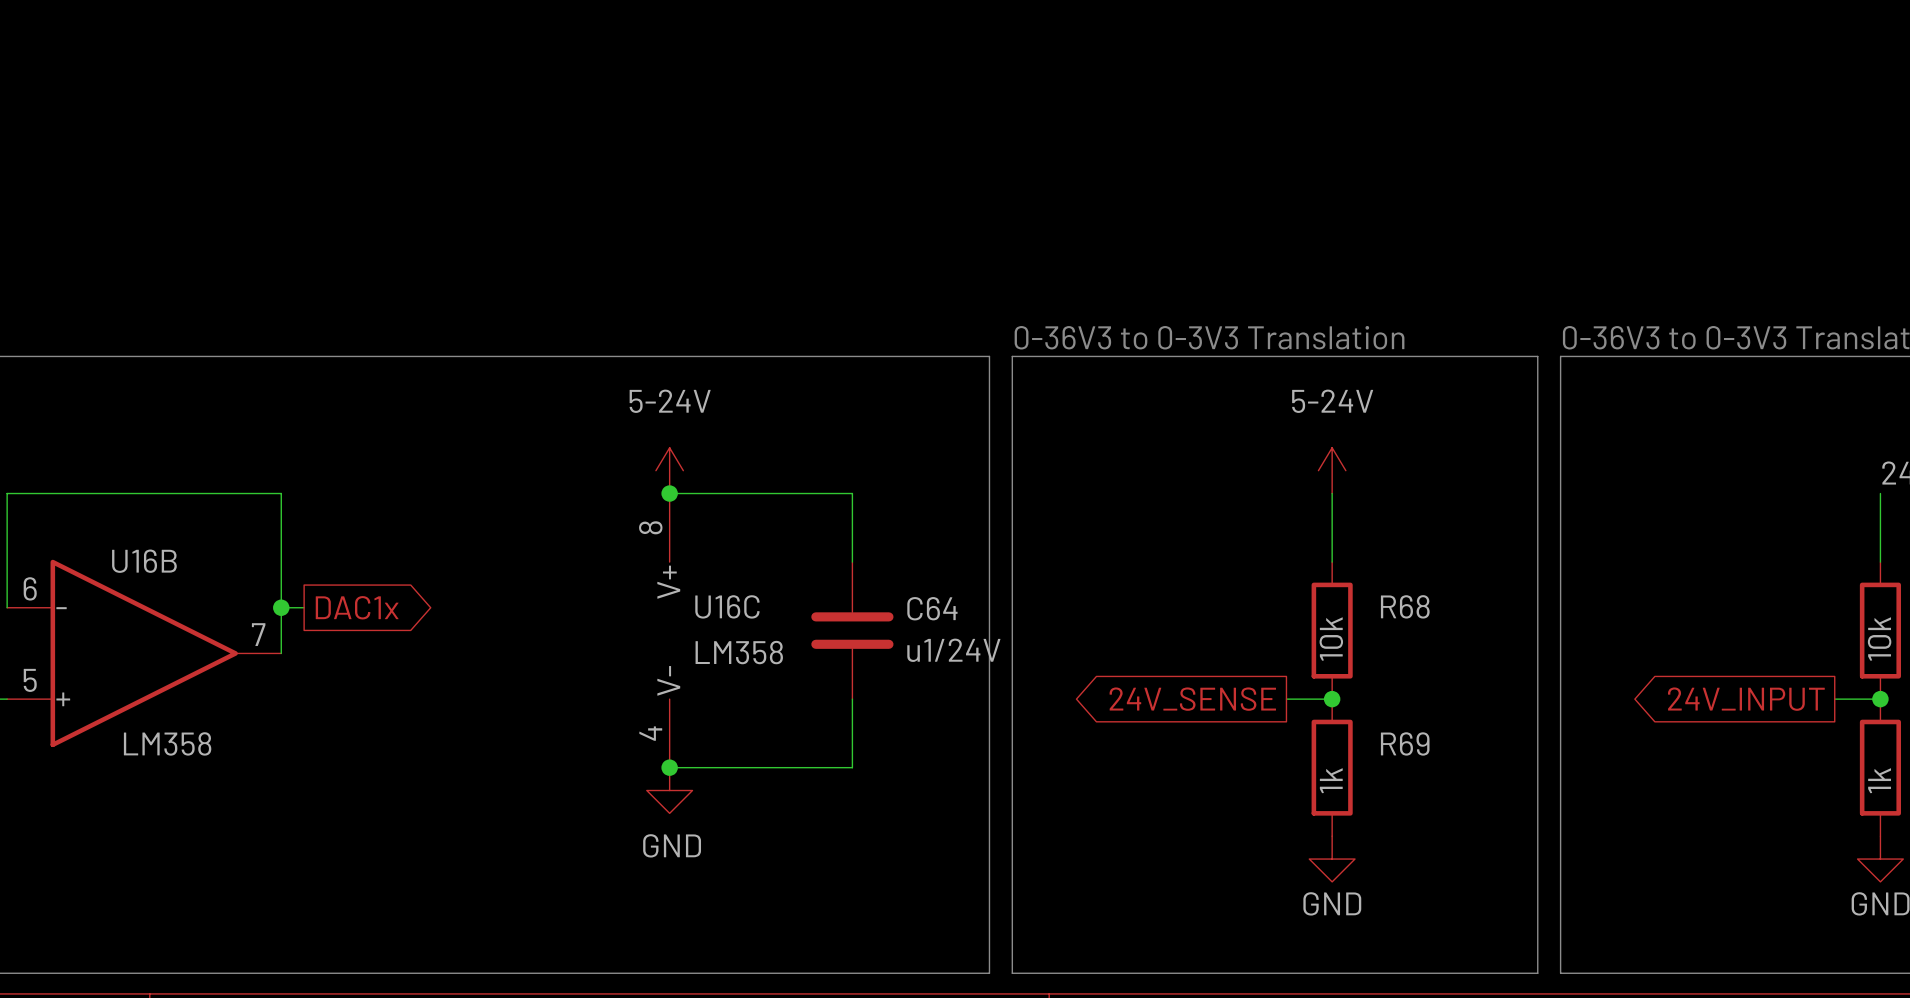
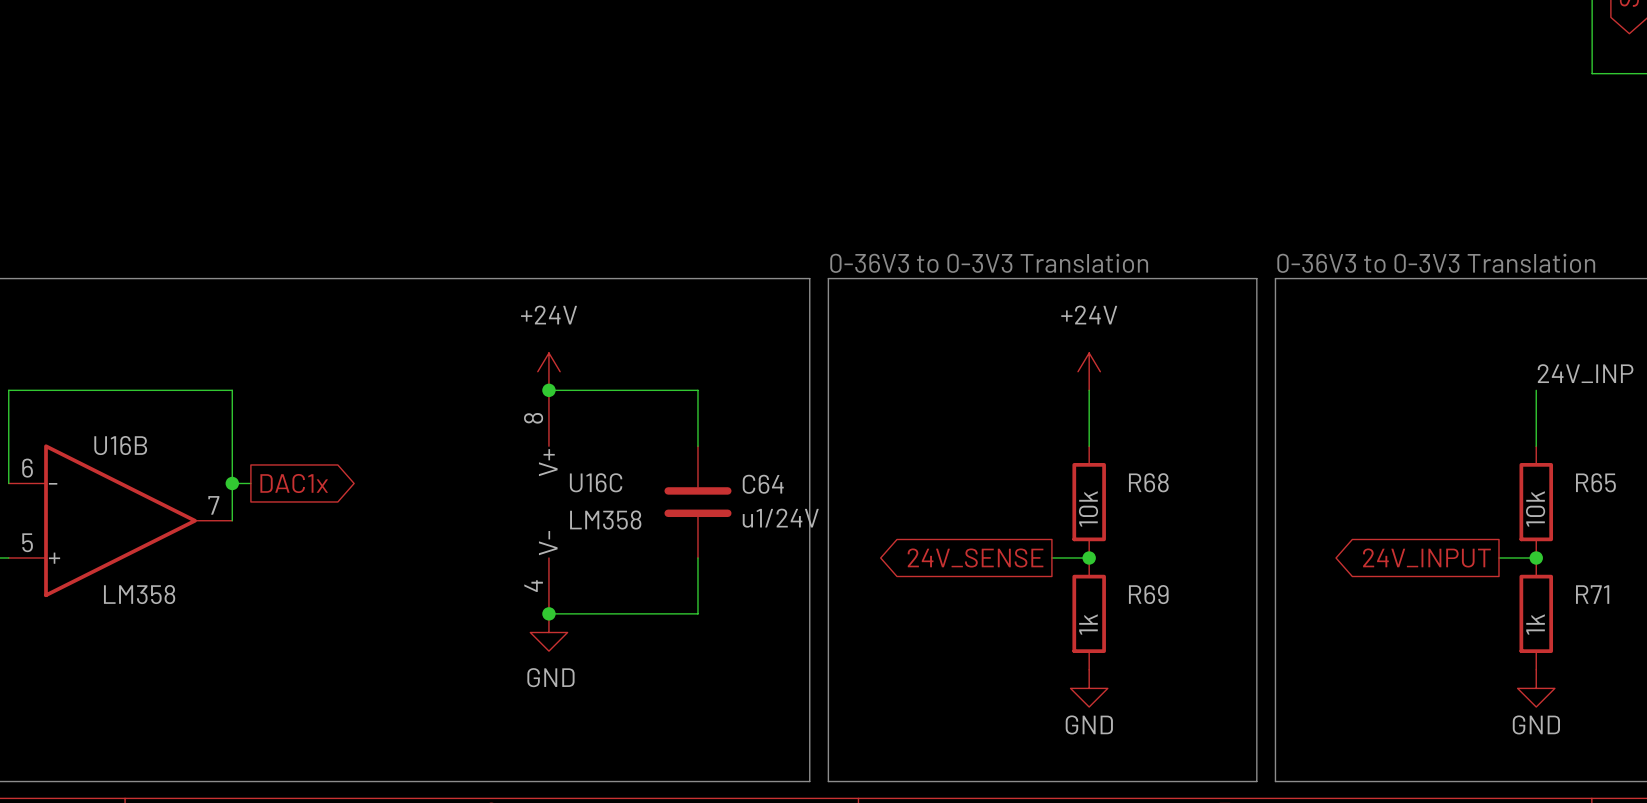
power symbol: 5-24V (669, 470) -> +24V (548, 371)
power symbol: 5-24V (1332, 470) -> +24V (1089, 371)

